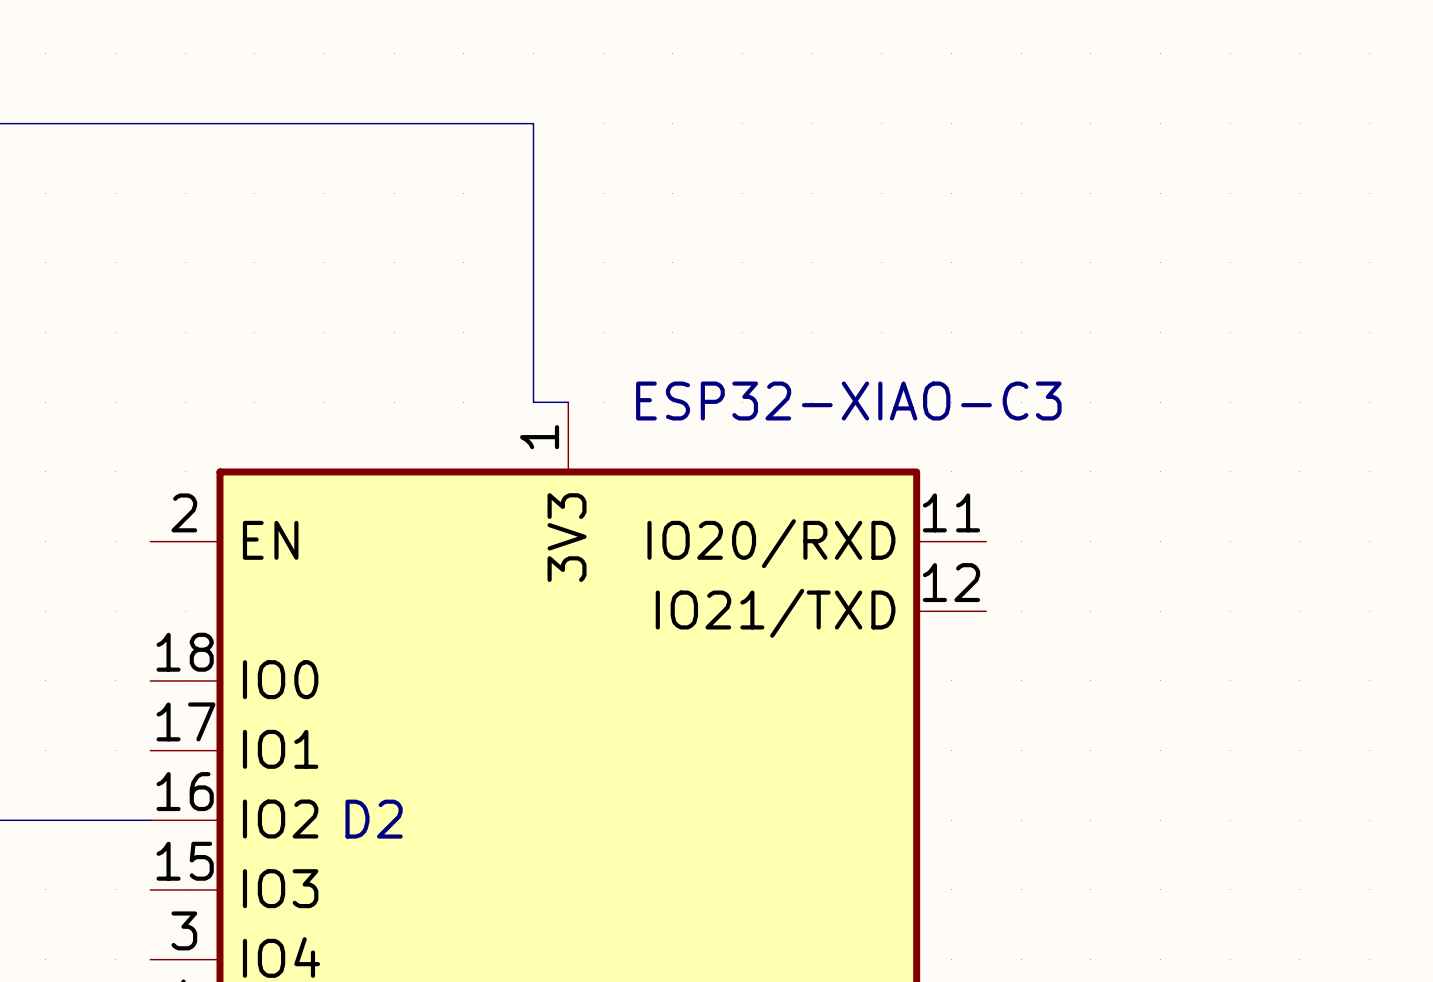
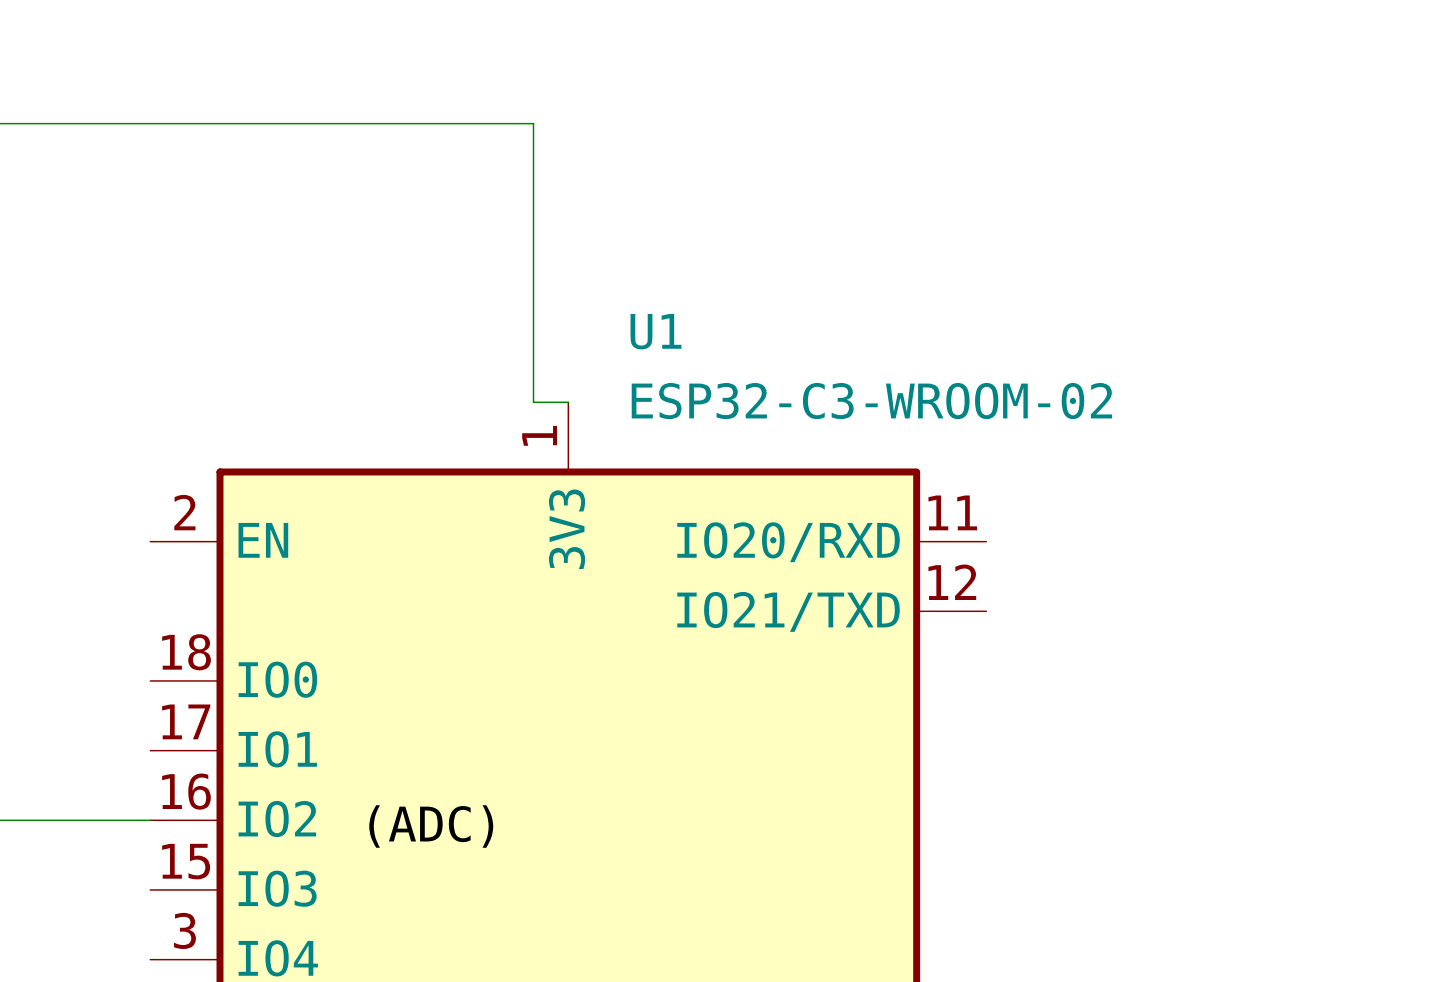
U1 name: none -> U1 (655, 331)
U1 value: ESP32-XIAO-C3 (848, 401) -> ESP32-C3-WROOM-02 (871, 401)
text: D2 (374, 819) -> none
label: none -> (ADC) (431, 826)

